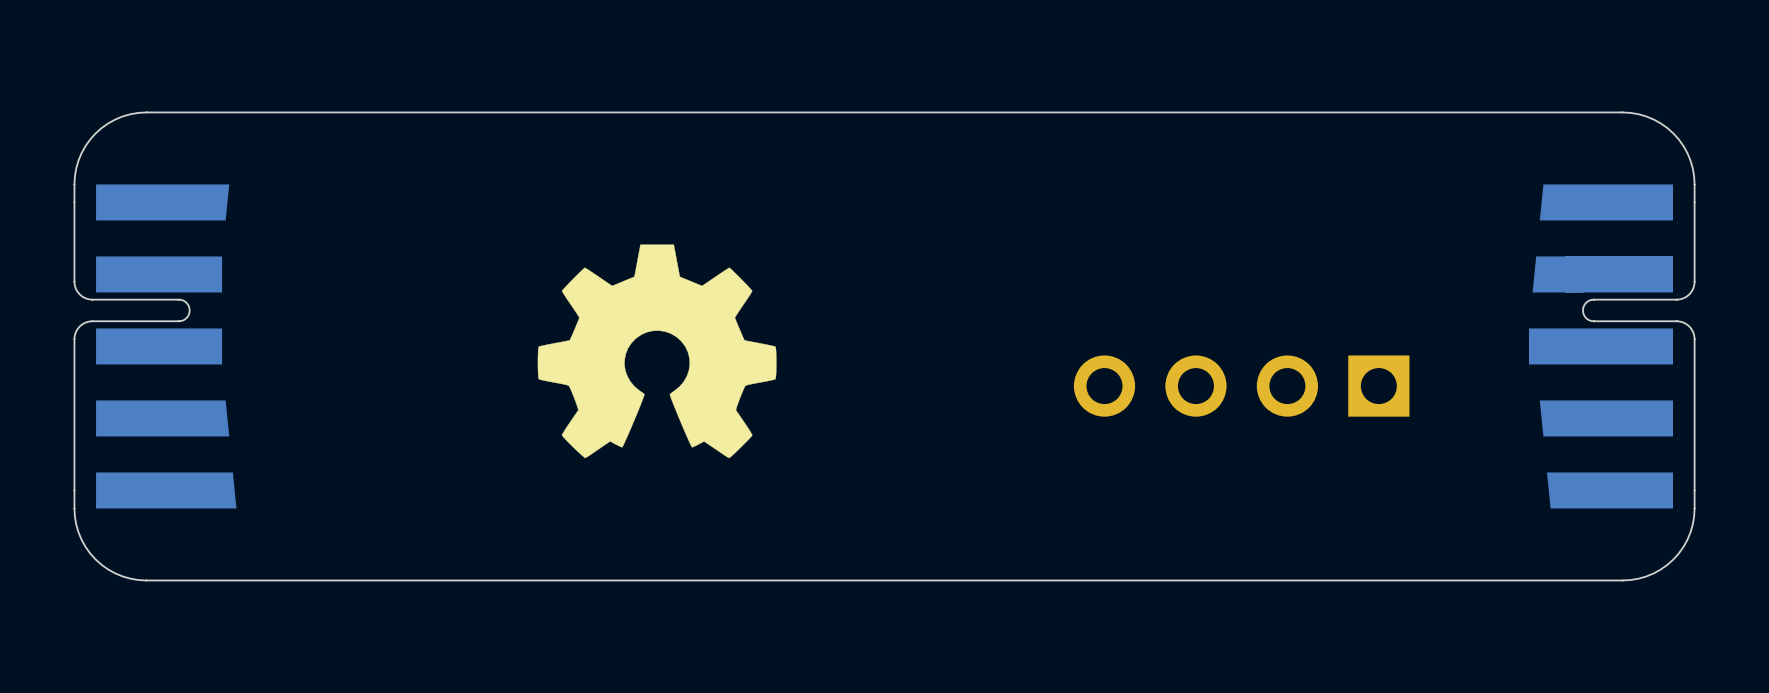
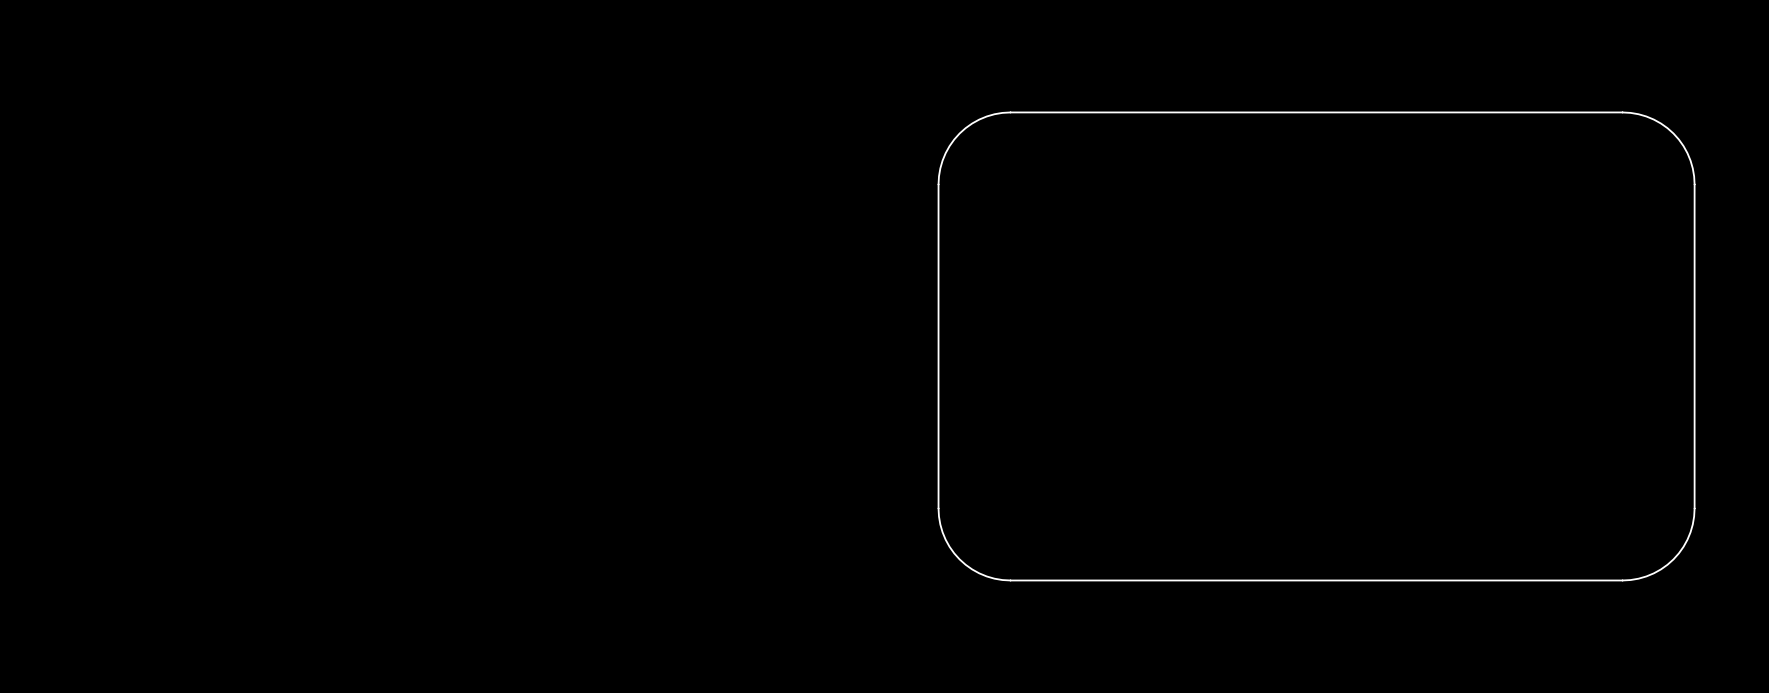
board edge: (1010, 112) (138, 112) (122, 116) (108, 123) (90, 139) (81, 153) (76, 168) (74, 202) -> (1010, 112) (986, 116) (972, 123) (959, 133) (945, 153) (940, 168) (938, 184) (938, 508) (940, 524) (949, 546) (965, 564) (986, 576) (1010, 580)
board edge: none -> (1694, 202) (1694, 490)
drawing: [537, 244, 777, 459] -> none
part: (155, 346) -> none
part: (1612, 346) -> none
part: (1241, 386) -> none
board edge: (74, 490) (76, 524) (81, 539) (90, 553) (108, 569) (122, 576) (138, 580) (1010, 580) -> none

